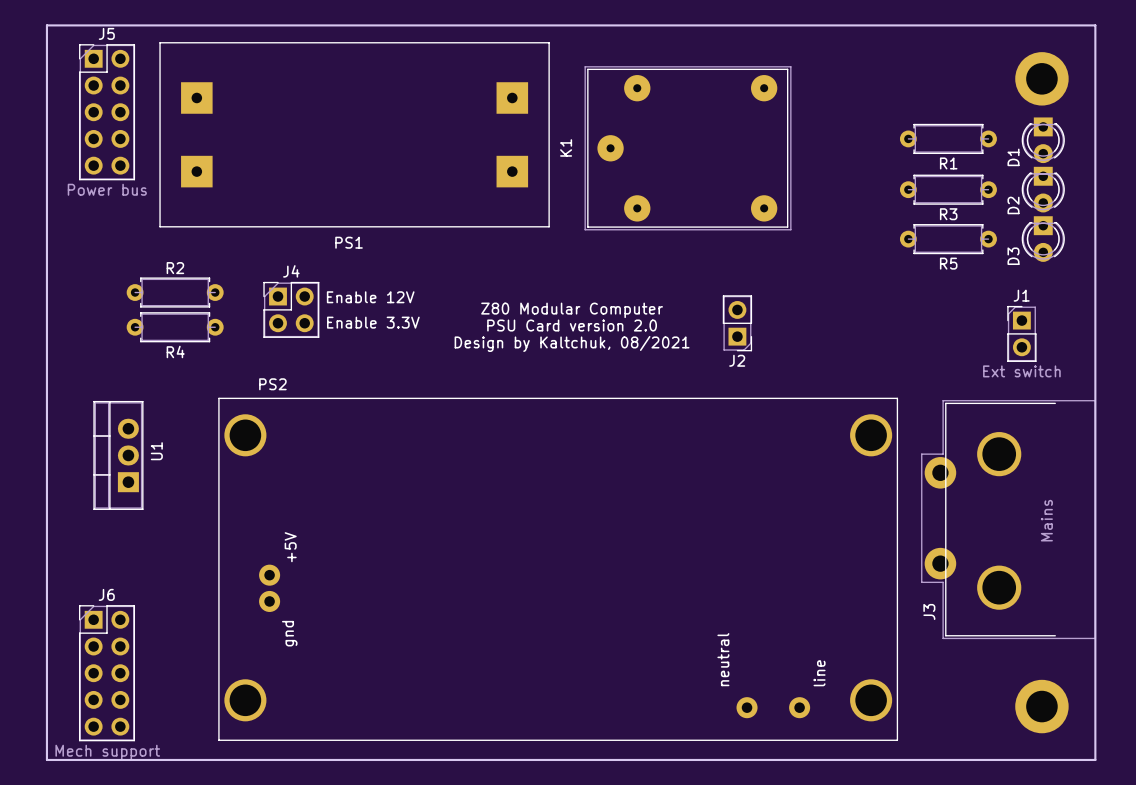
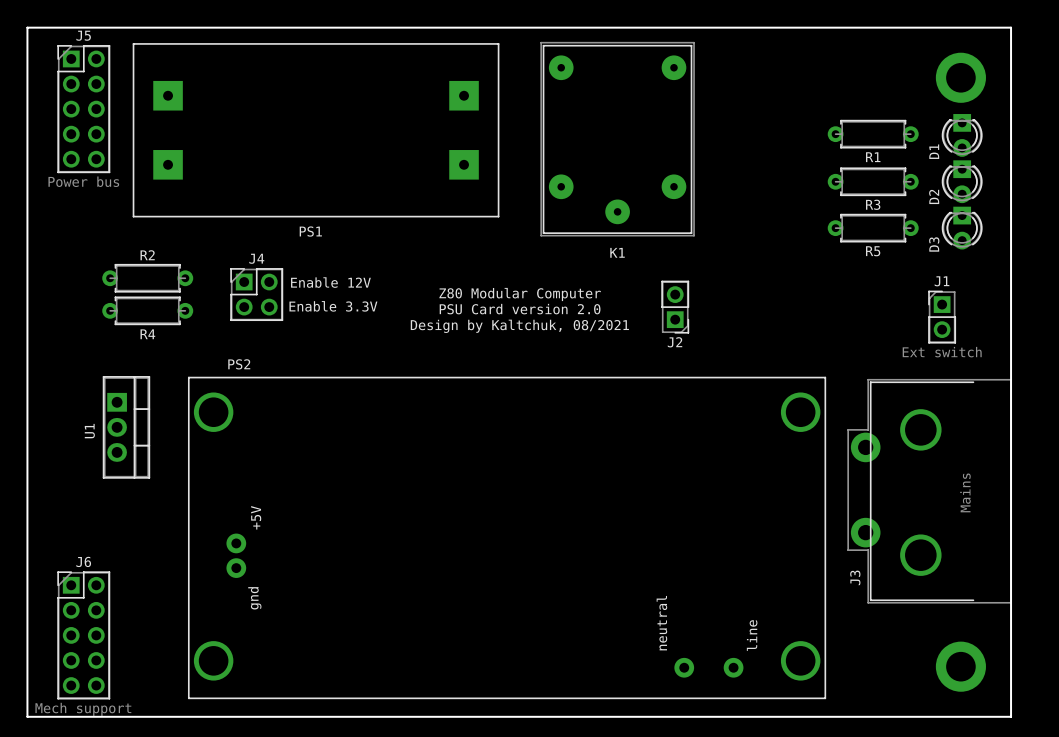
K1 rotation: 0° (688, 148) -> 90° counterclockwise (617, 139)
U1 rotation: 0° (118, 455) -> 180° (126, 427)

